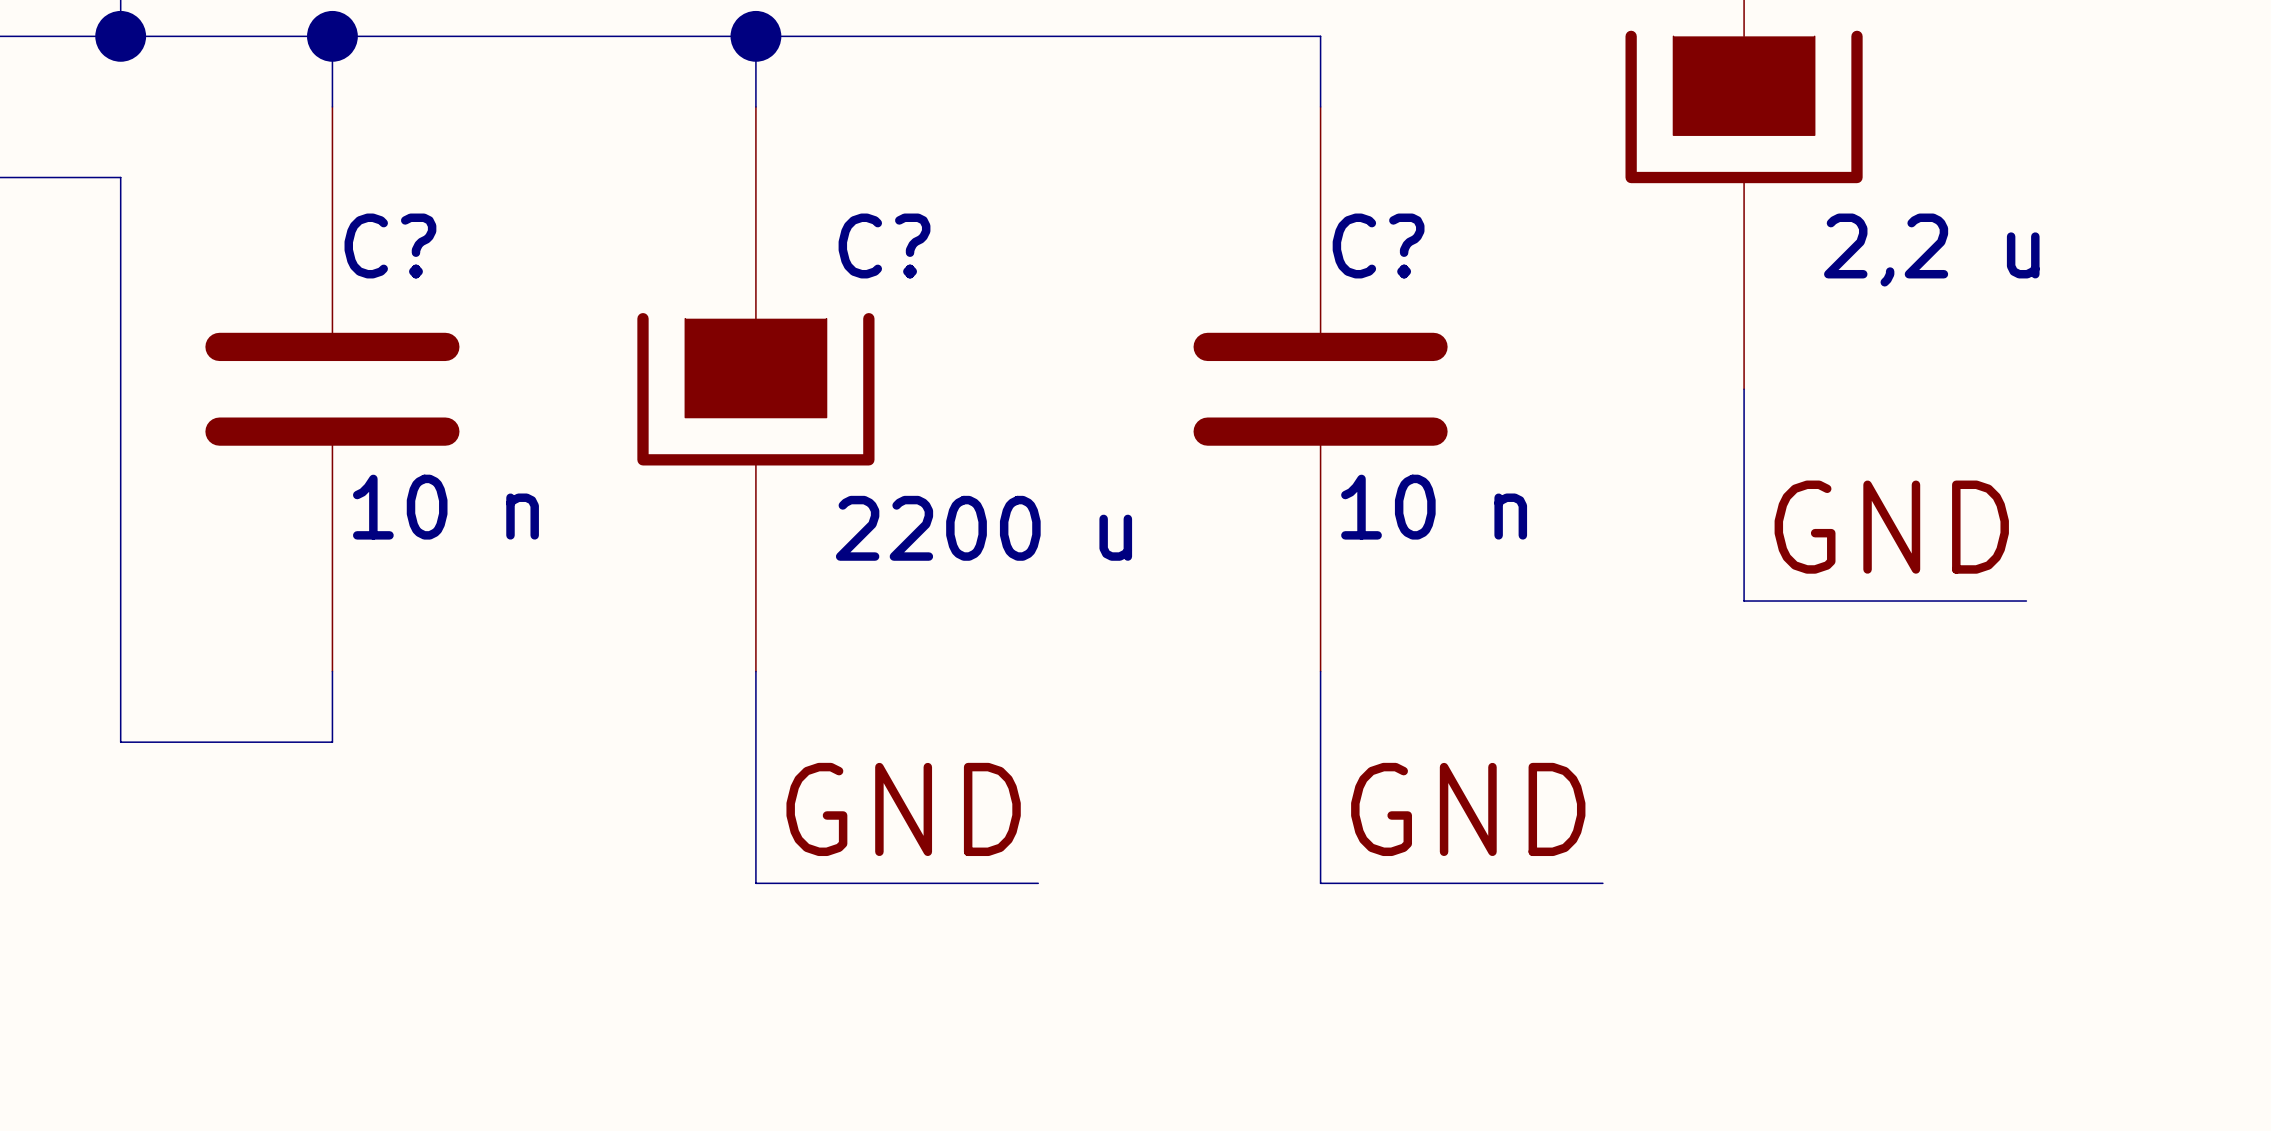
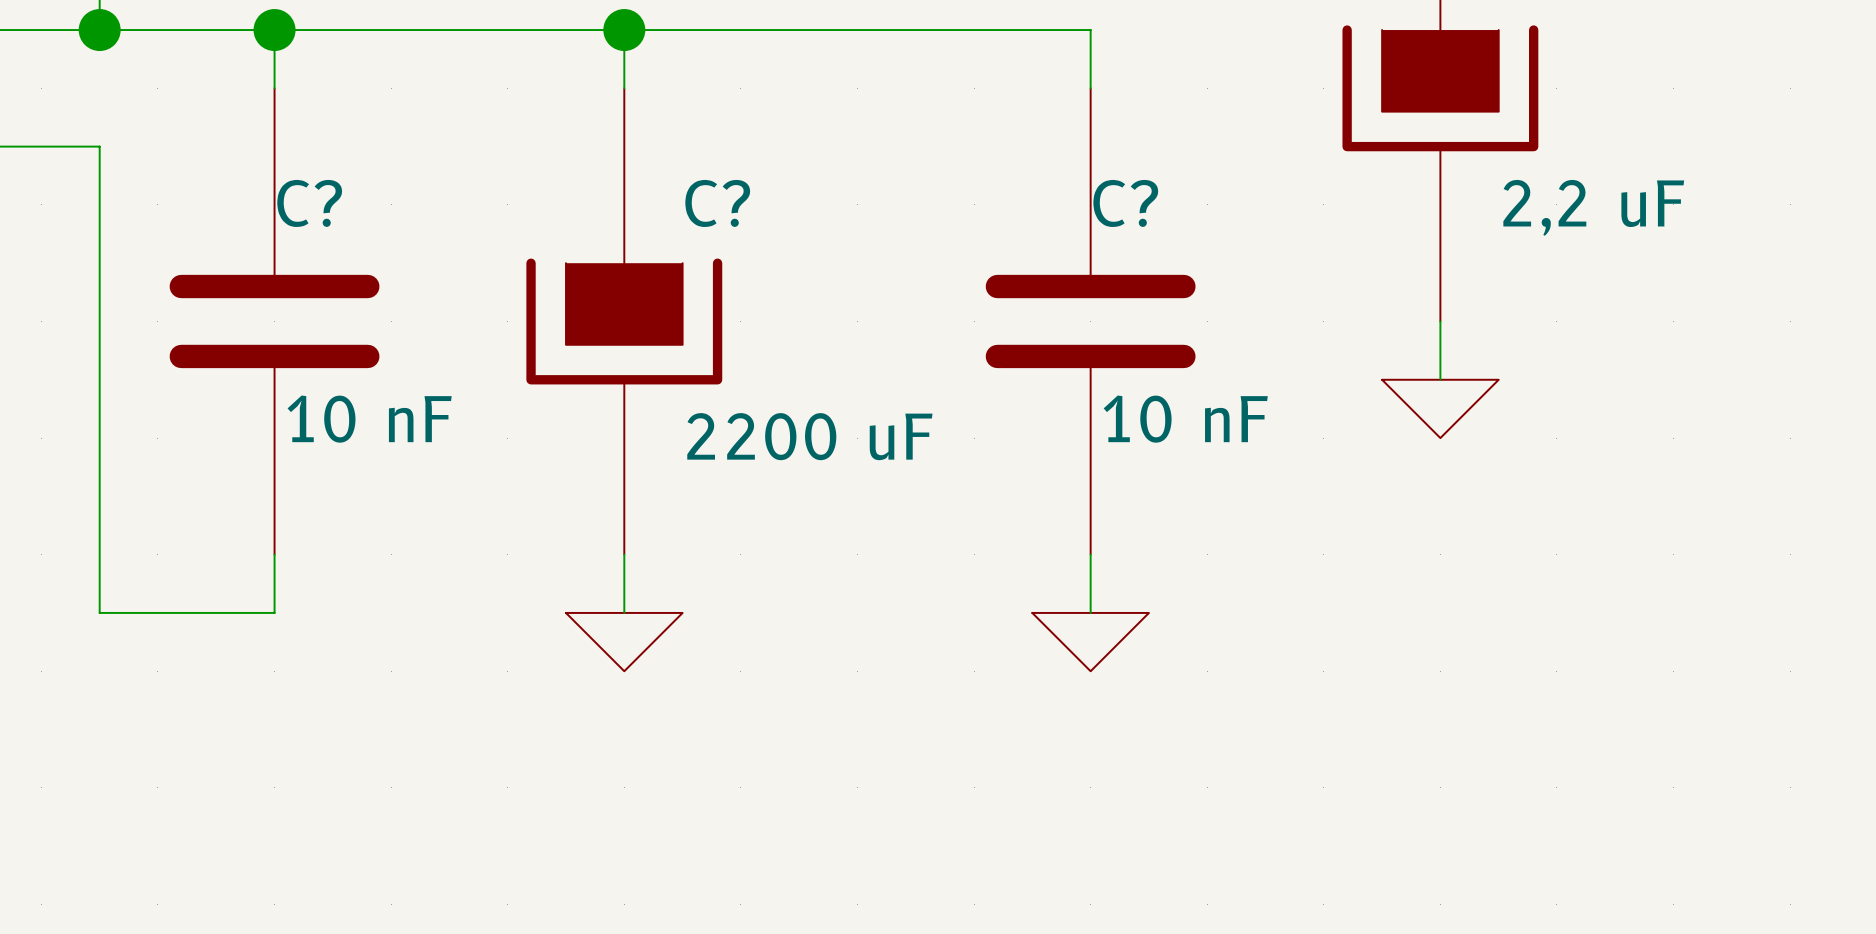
part value: 2,2 u (1931, 250) -> 2,2 uF (1593, 207)
wire: (1744, 459) (1744, 601) (2026, 601) -> none
power symbol: none -> (1440, 408)
C? value: 10 n (445, 507) -> 10 nF (369, 419)
C? value: 10 n (1434, 507) -> 10 nF (1185, 419)
label: GND (1891, 527) -> none
C? value: 2200 u (984, 528) -> 2200 uF (809, 436)
wire: (755, 742) (755, 883) (1038, 883) -> none
wire: (1320, 742) (1320, 883) (1602, 883) -> none
power symbol: none -> (624, 642)
power symbol: none -> (1090, 642)
label: GND (903, 809) -> none
label: GND (1468, 809) -> none

